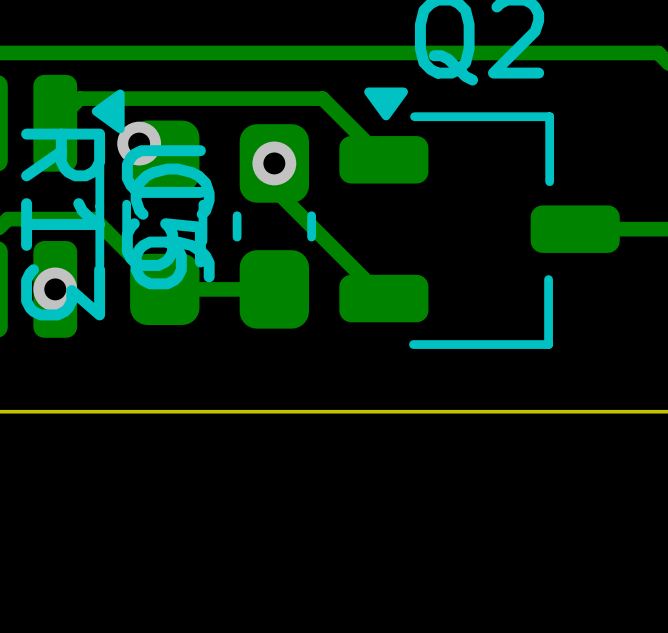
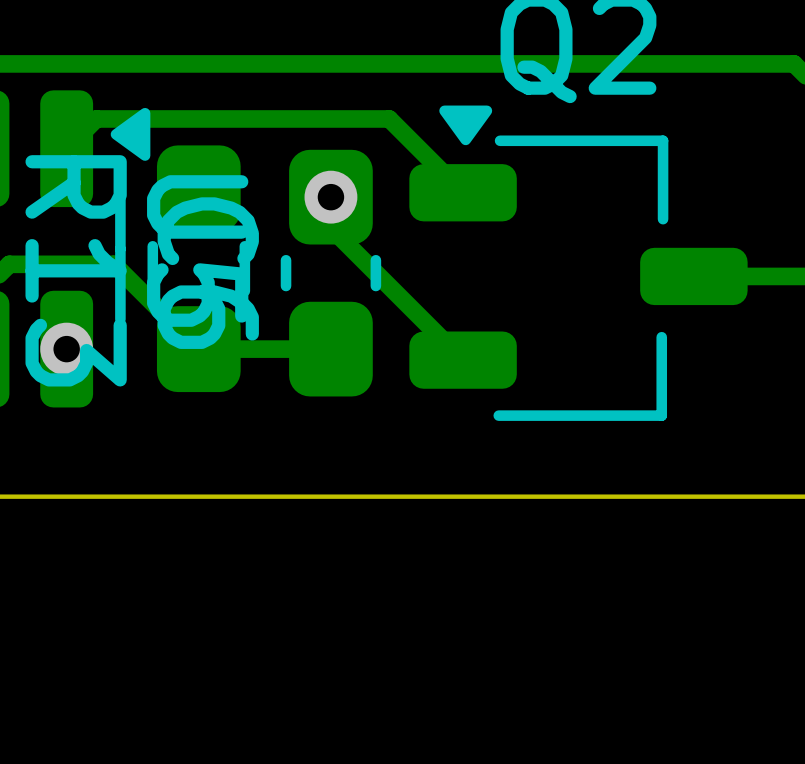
via: (139, 143) -> none

